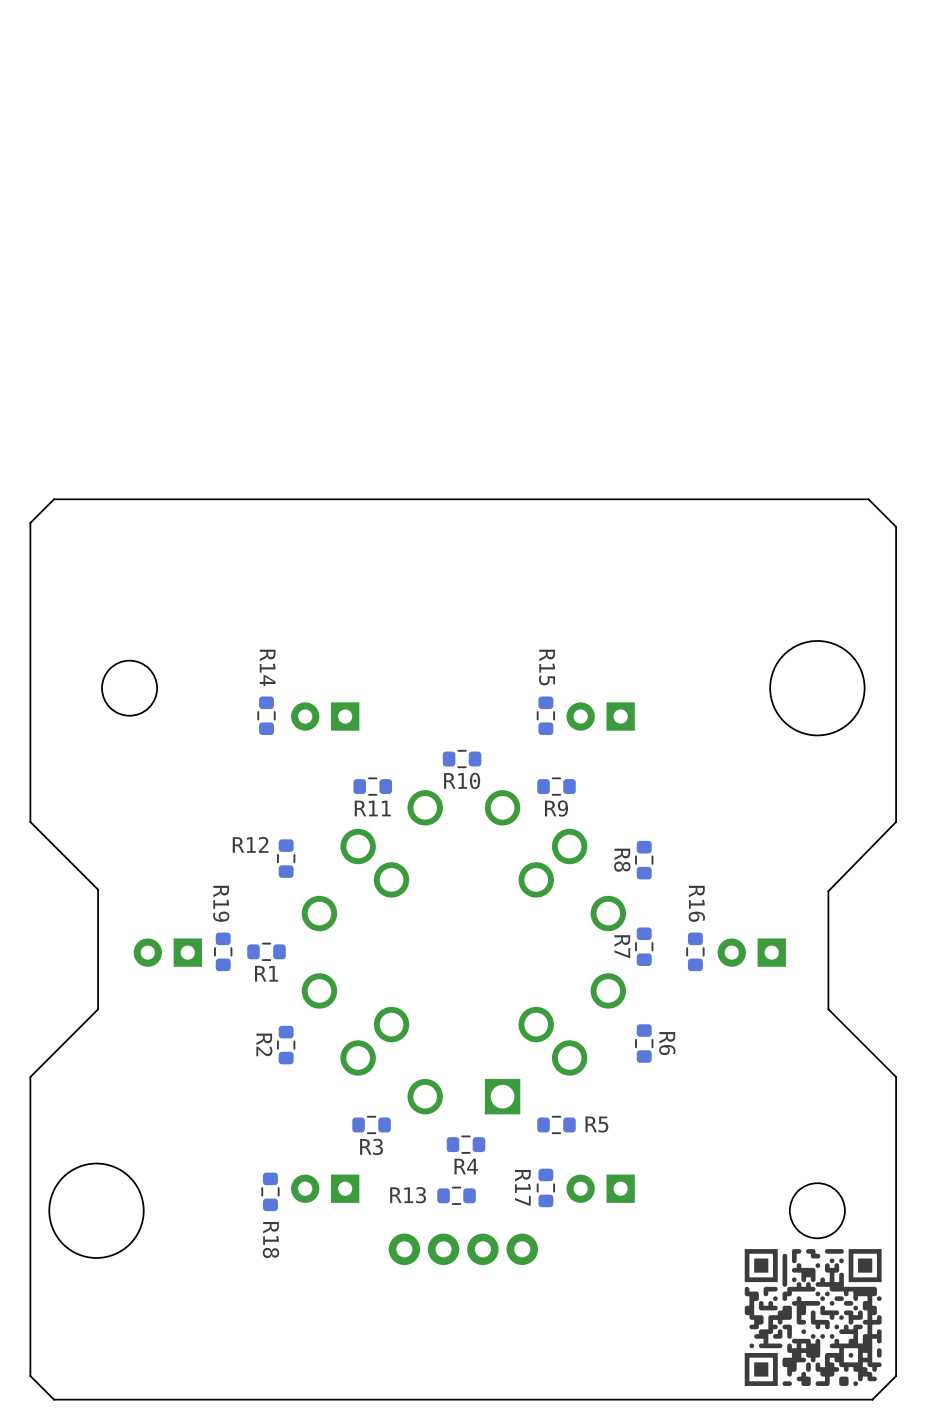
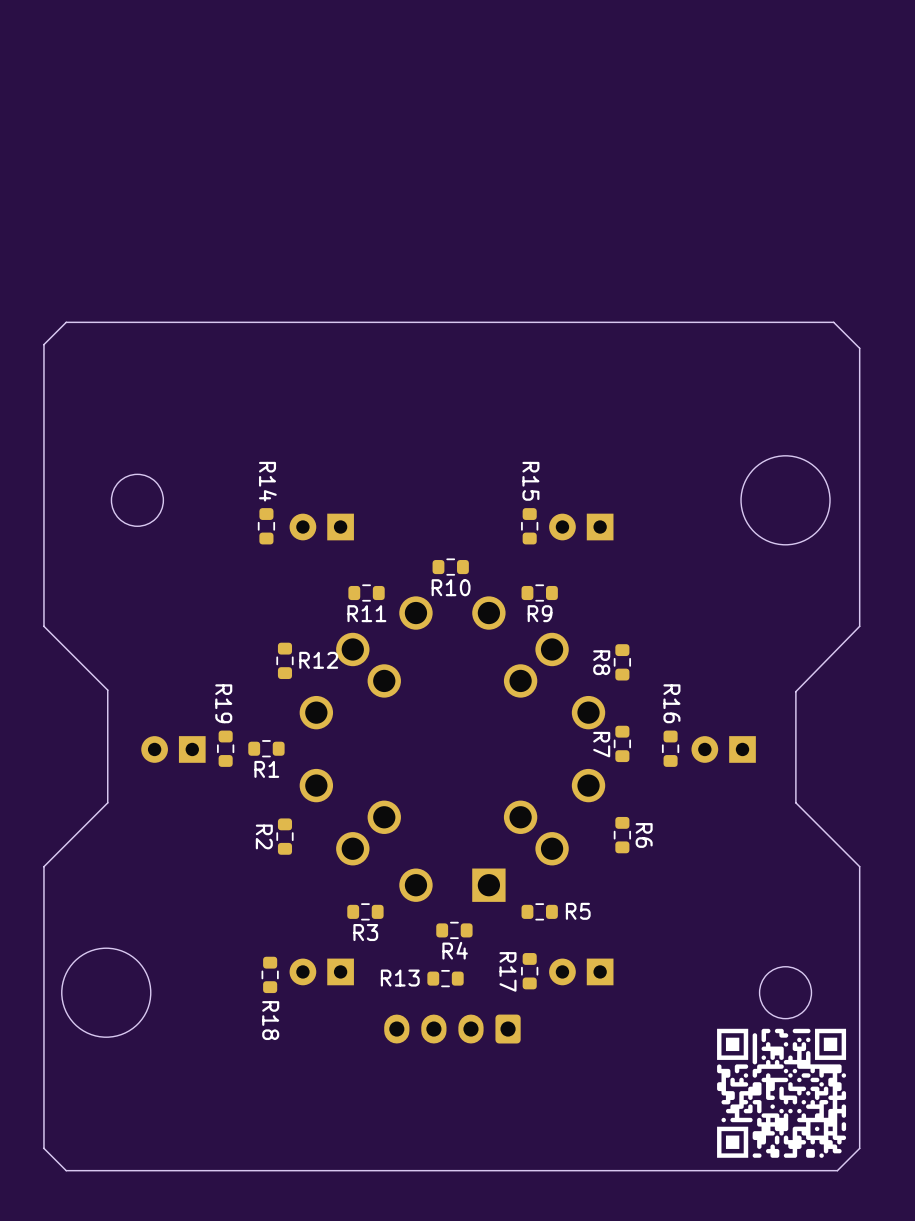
R12 name position: R12 (250, 844) -> R12 (318, 660)
part footprint: [388, 1233, 539, 1266] -> [384, 1014, 521, 1044]

